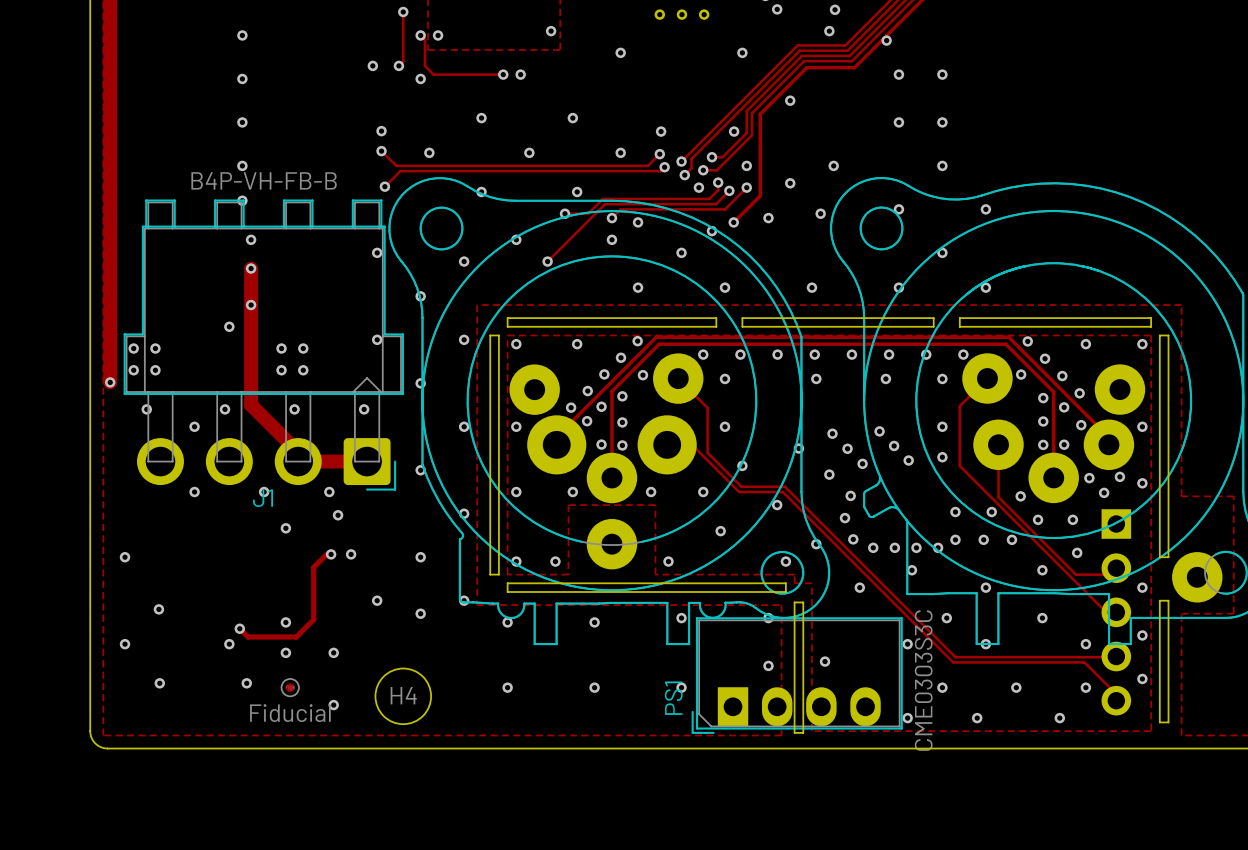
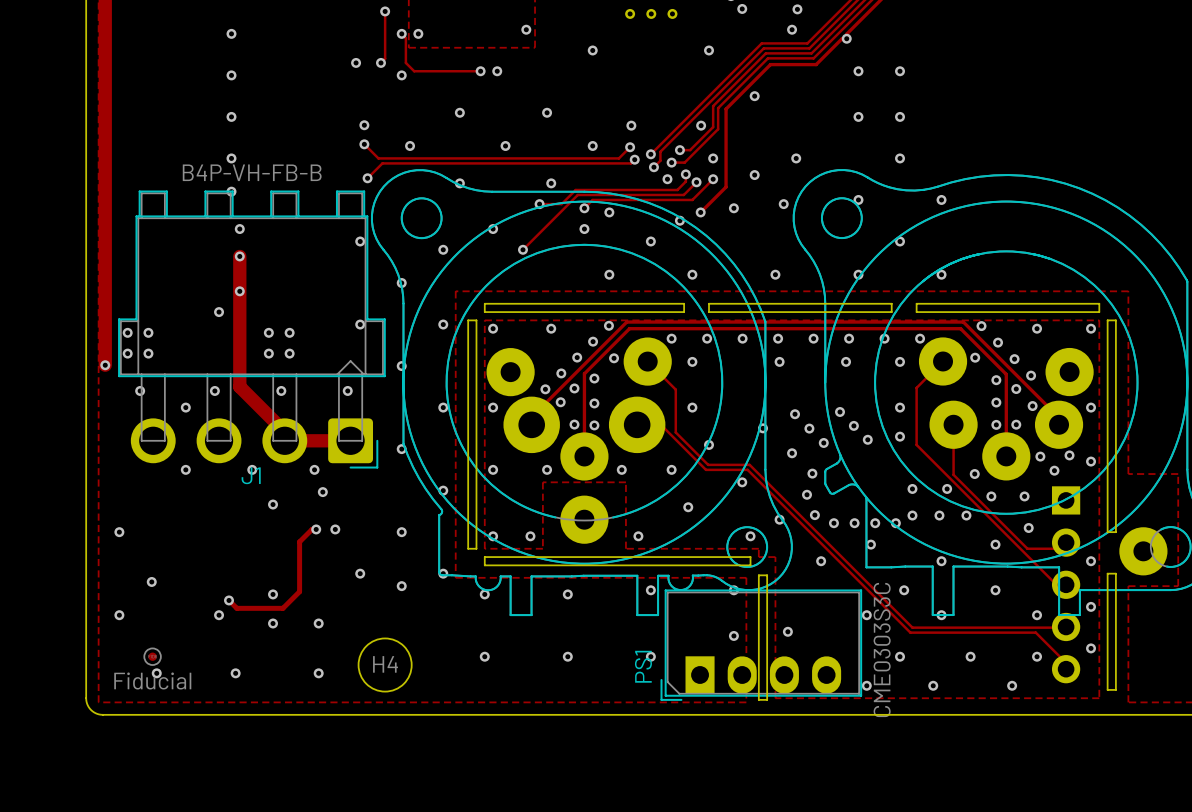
via position: (159, 683) -> (156, 673)
via position: (246, 683) -> (235, 673)
part position: (290, 687) -> (152, 656)

